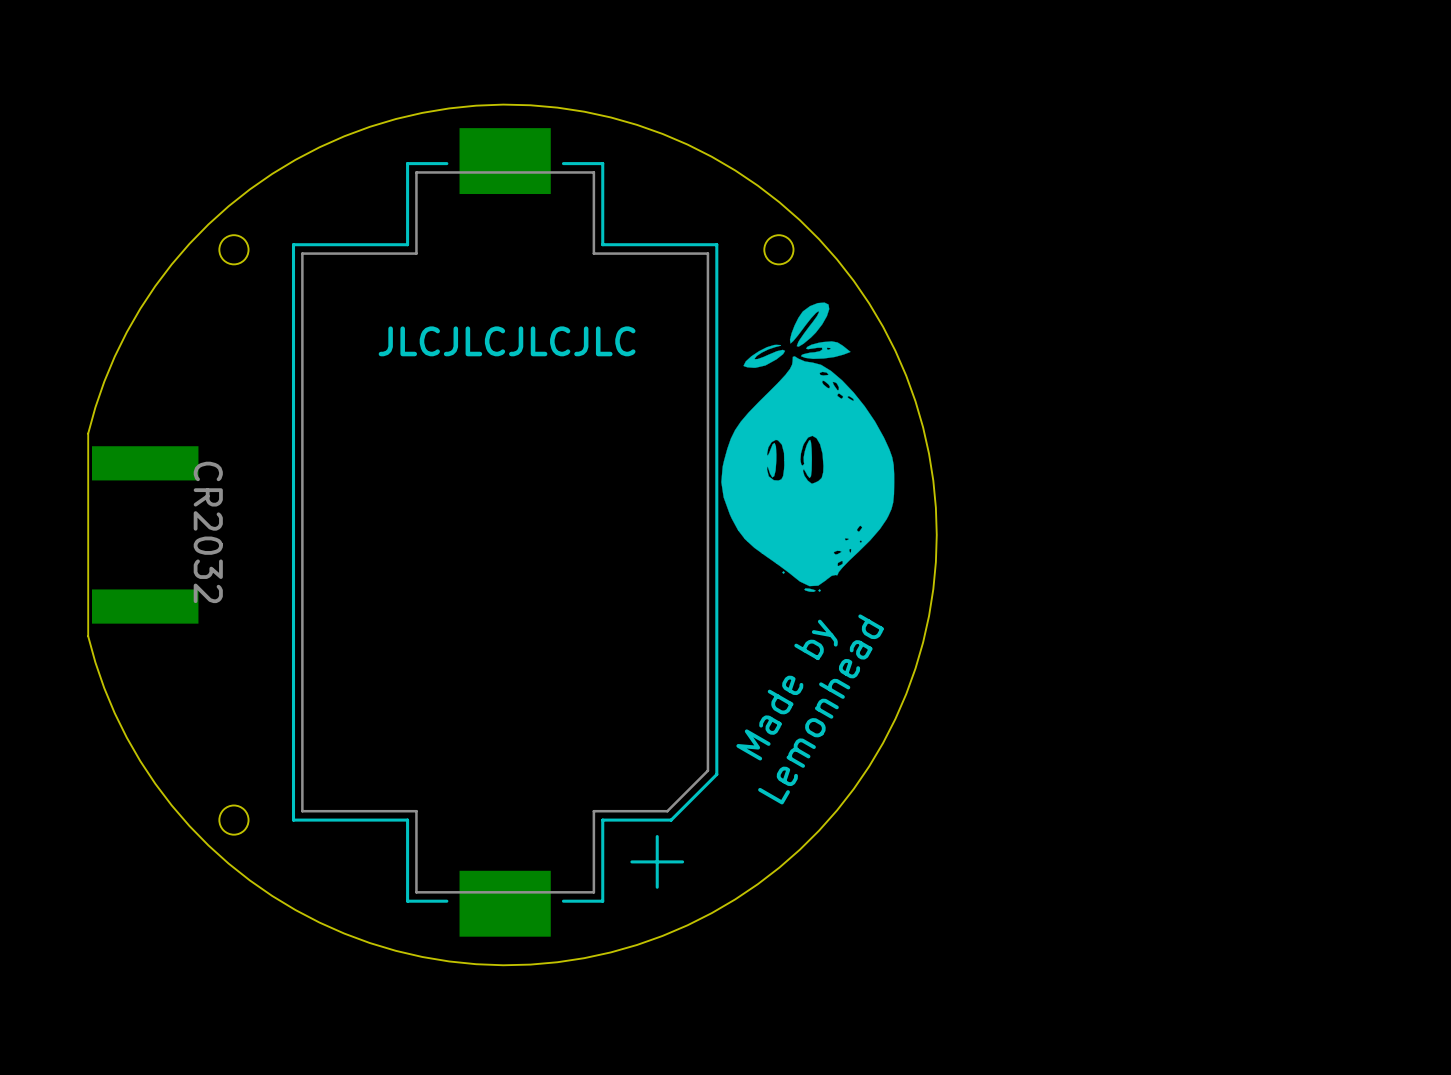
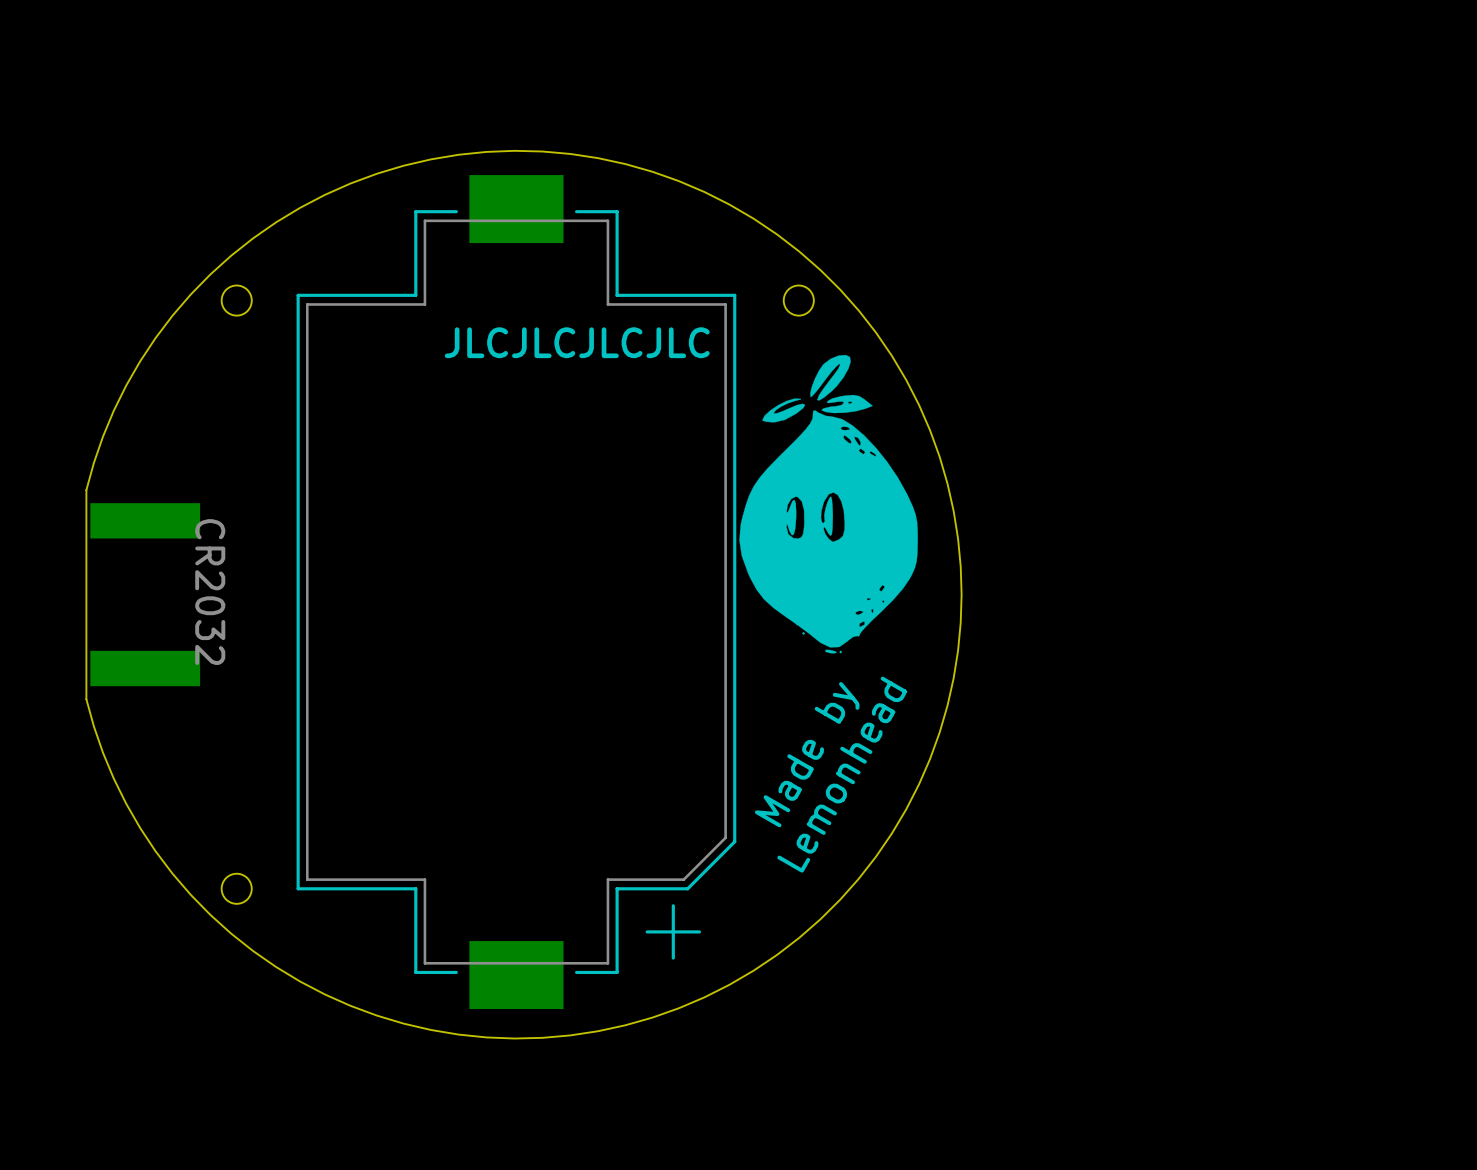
text position: JLCJLCJLCJLC (507, 341) -> JLCJLCJLCJLC (577, 342)

